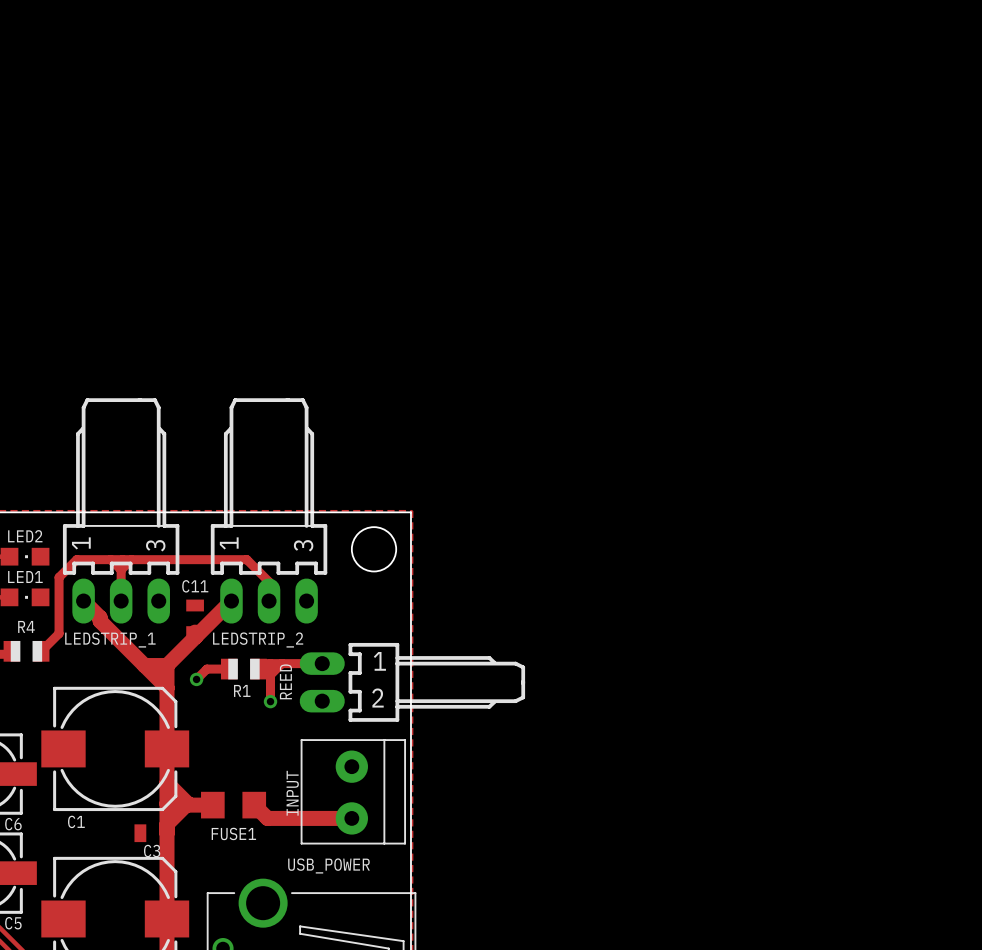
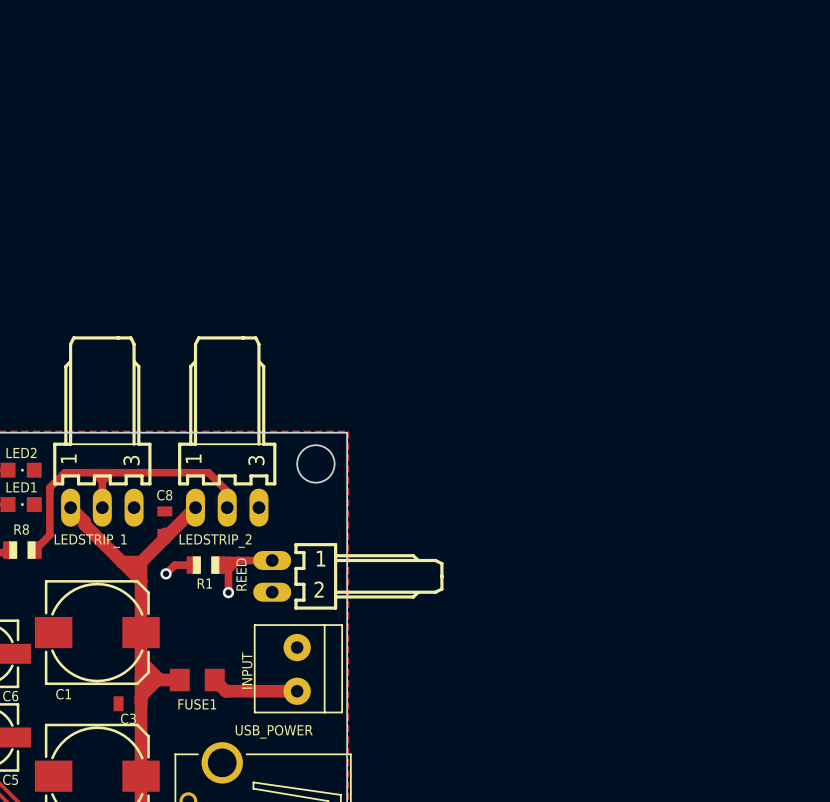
C11 name: C11 (195, 586) -> C8 (164, 495)
R4 name: R4 (26, 626) -> R8 (21, 529)

